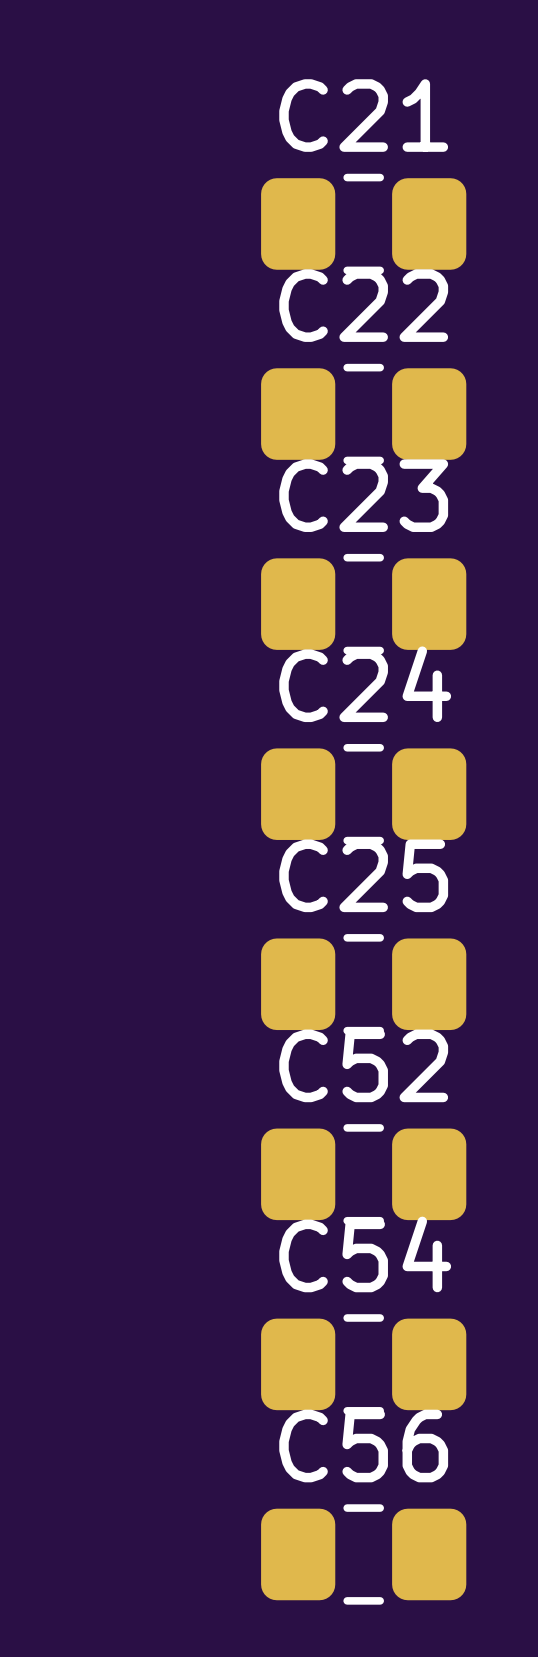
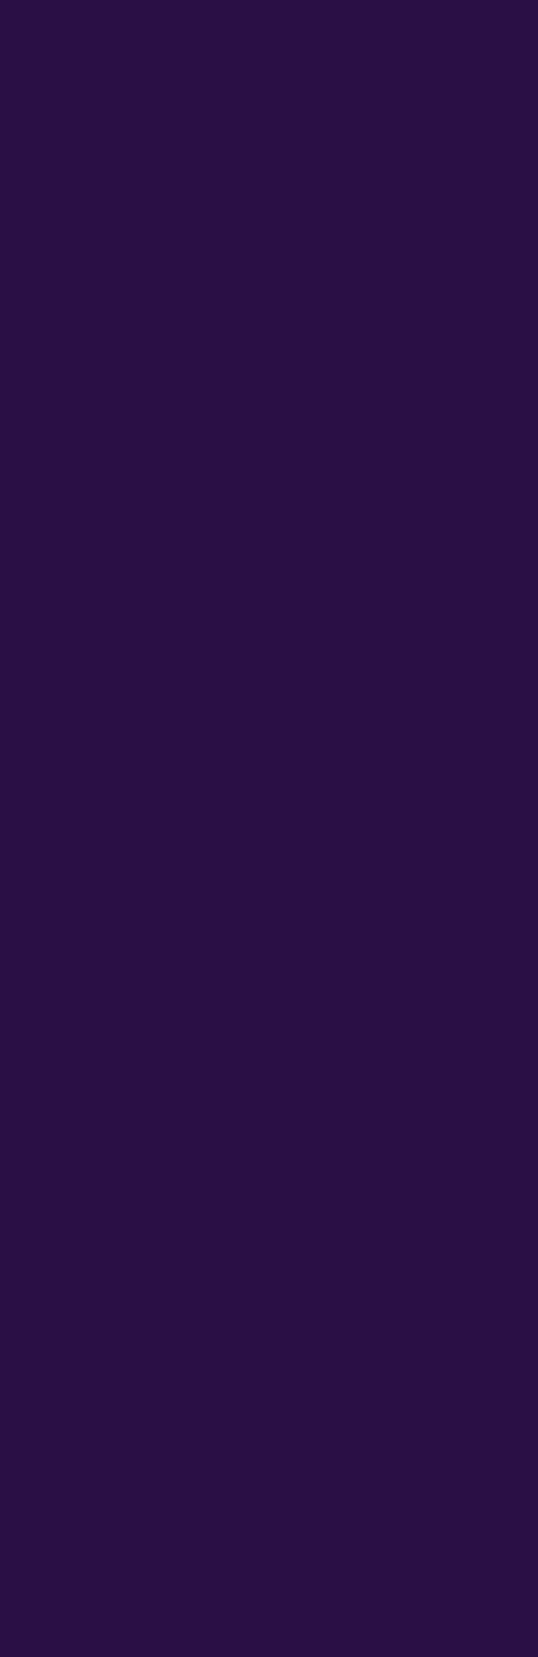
C21: (363, 223) -> none
C22: (363, 414) -> none
C23: (363, 604) -> none
C24: (363, 794) -> none
C25: (363, 984) -> none
C52: (363, 1174) -> none
C54: (363, 1364) -> none
C56: (363, 1554) -> none

